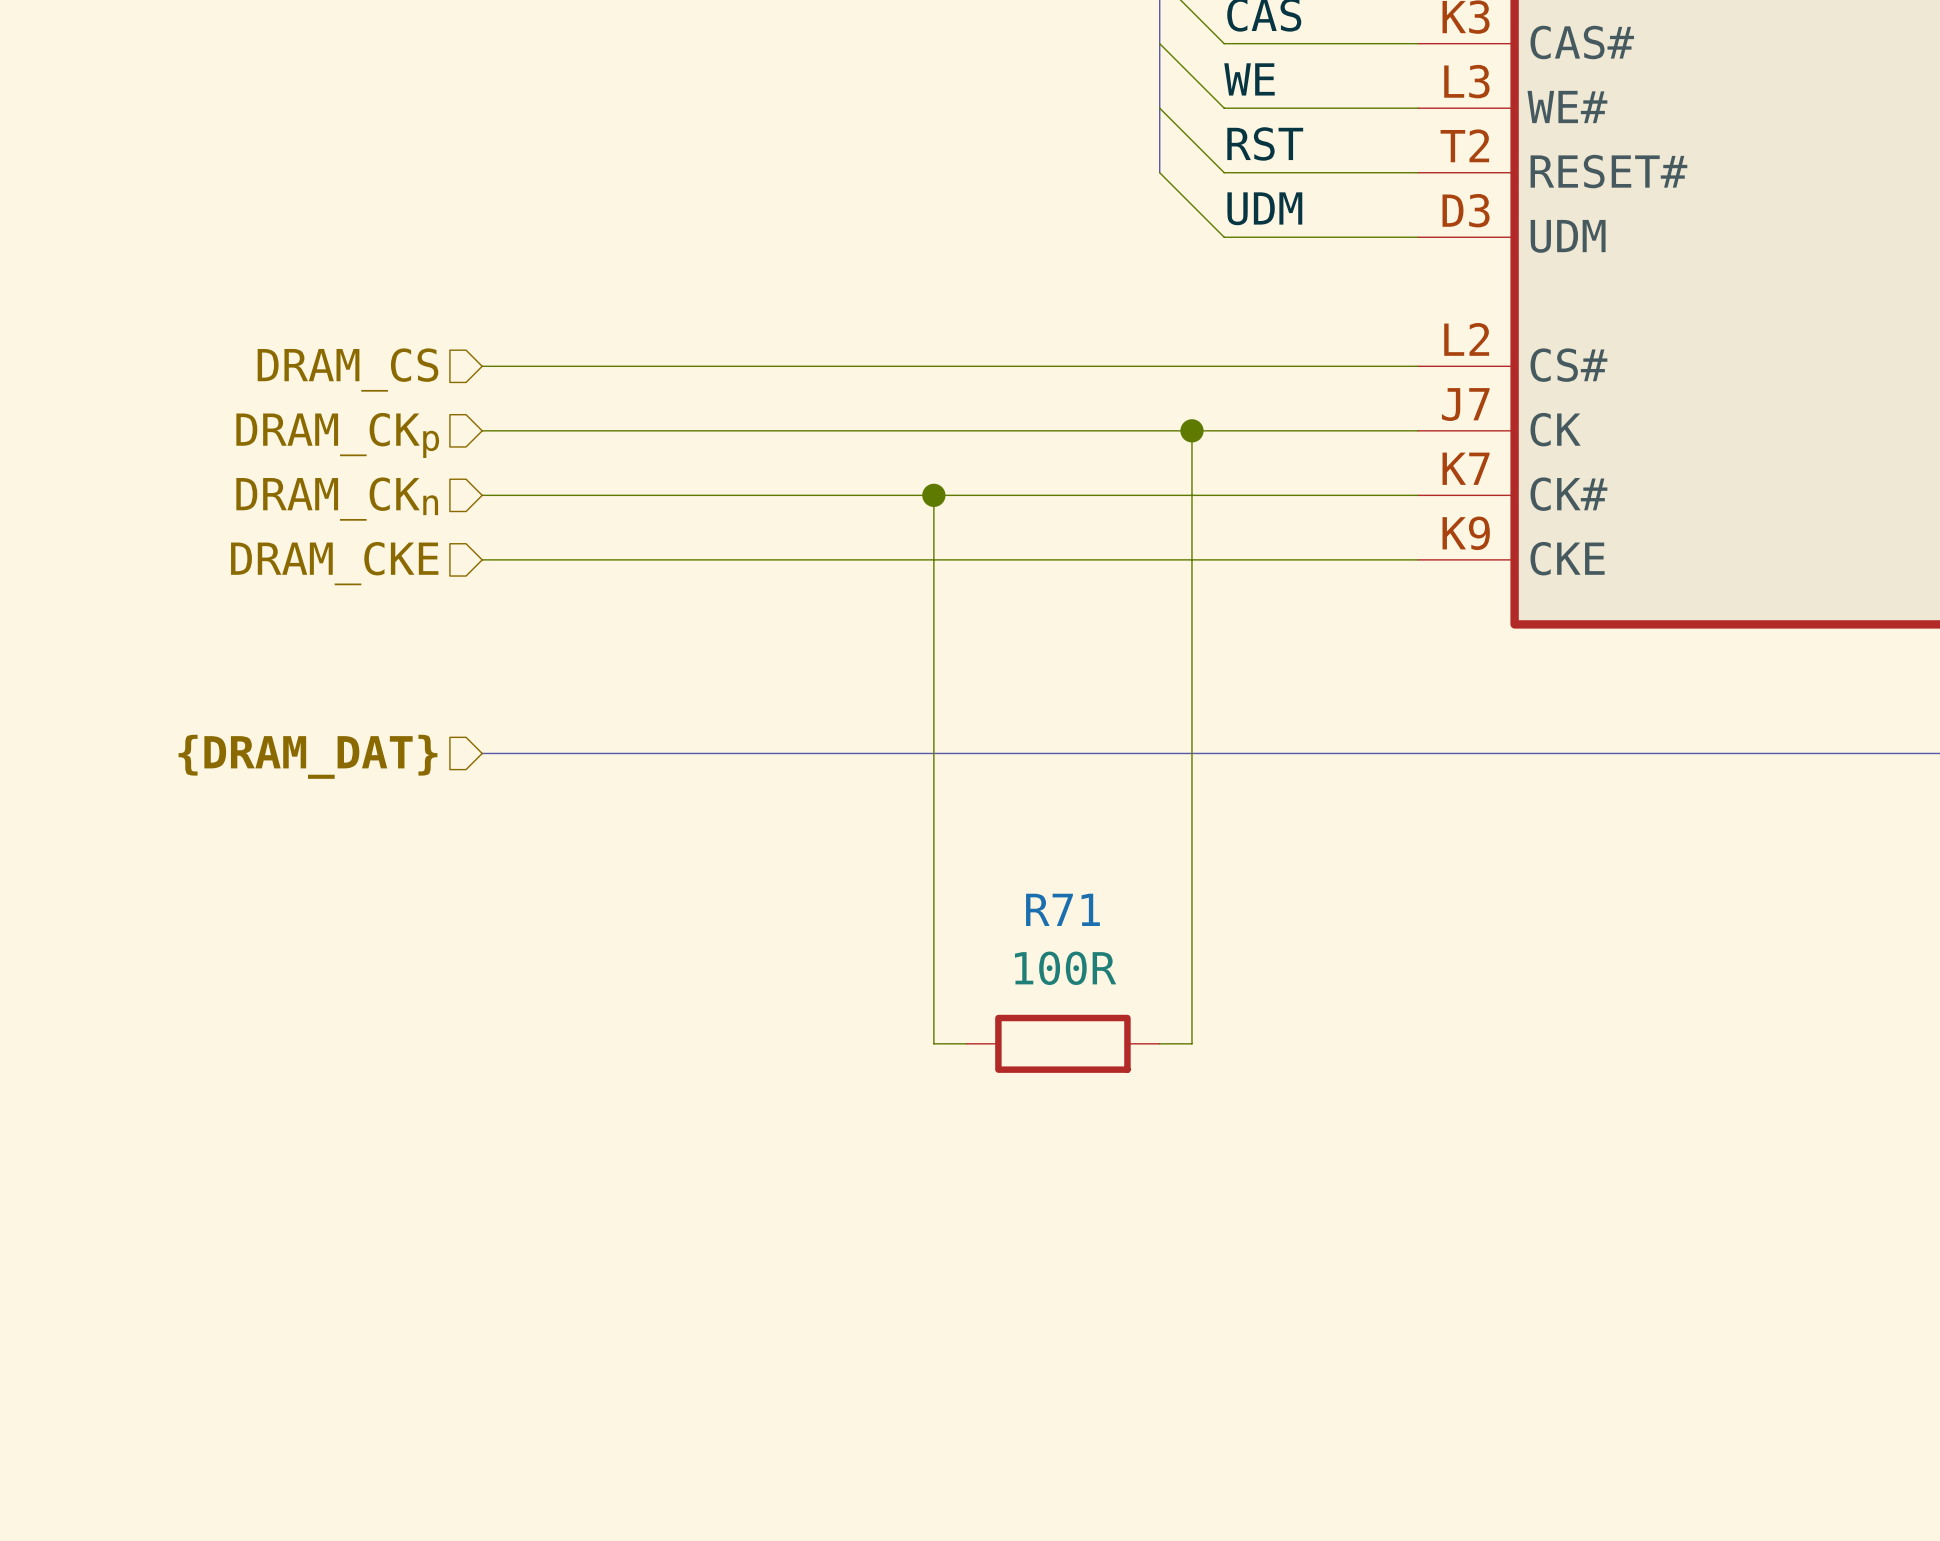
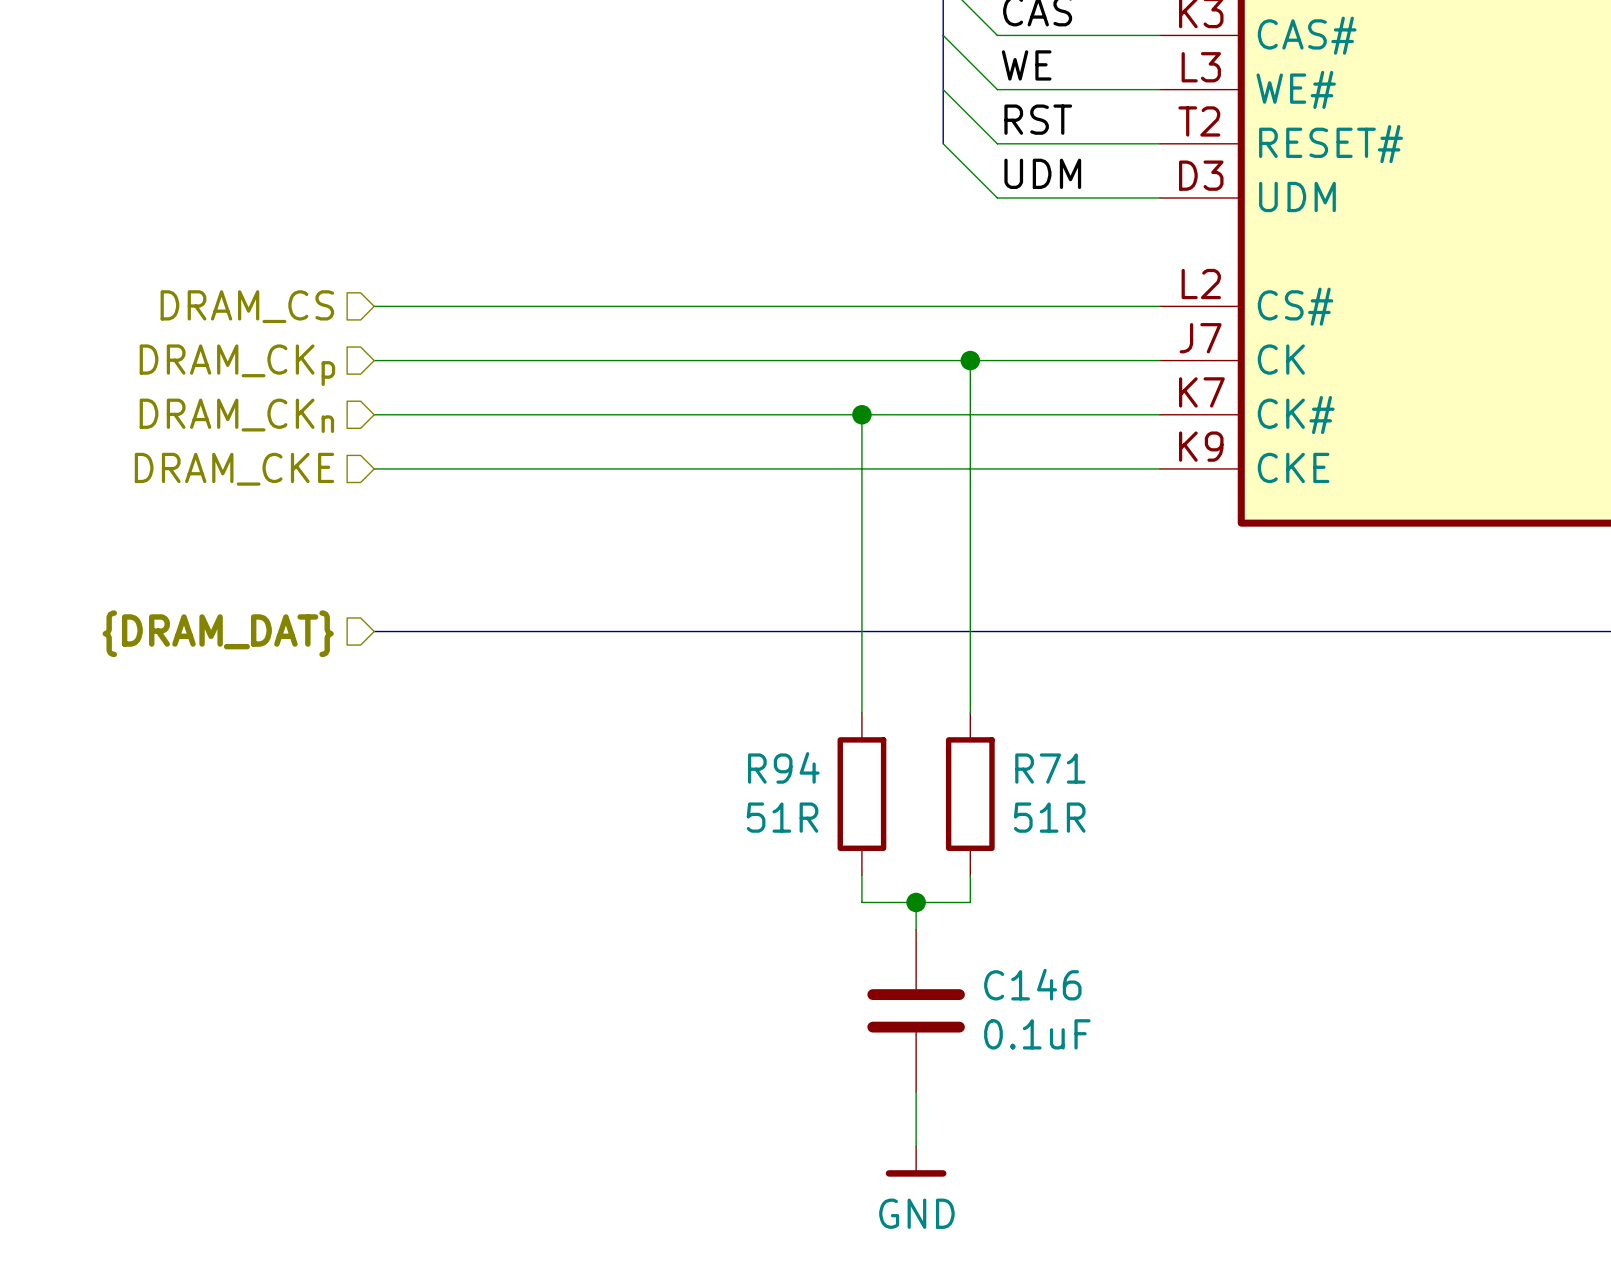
wire: (933, 495) (933, 1043) (966, 1043) -> none
junction position: (933, 495) -> (861, 414)
wire: none -> (861, 414) (861, 712)
wire: (1191, 850) (1191, 1043) (1159, 1043) -> none
R94: none -> 51R (861, 794)
R71 value: 100R (1065, 968) -> 51R (1049, 817)
wire: none -> (861, 875) (861, 902) (970, 902) (970, 875)
R71 rotation: 0° (1062, 1043) -> 90° clockwise (970, 794)
R71 position: (1062, 1043) -> (970, 794)
wire: none -> (916, 902) (916, 929)
junction: none -> (916, 902)
C146: none -> 0.1uF (916, 1010)
wire: none -> (916, 1092) (916, 1146)
power symbol: none -> GND (916, 1161)

